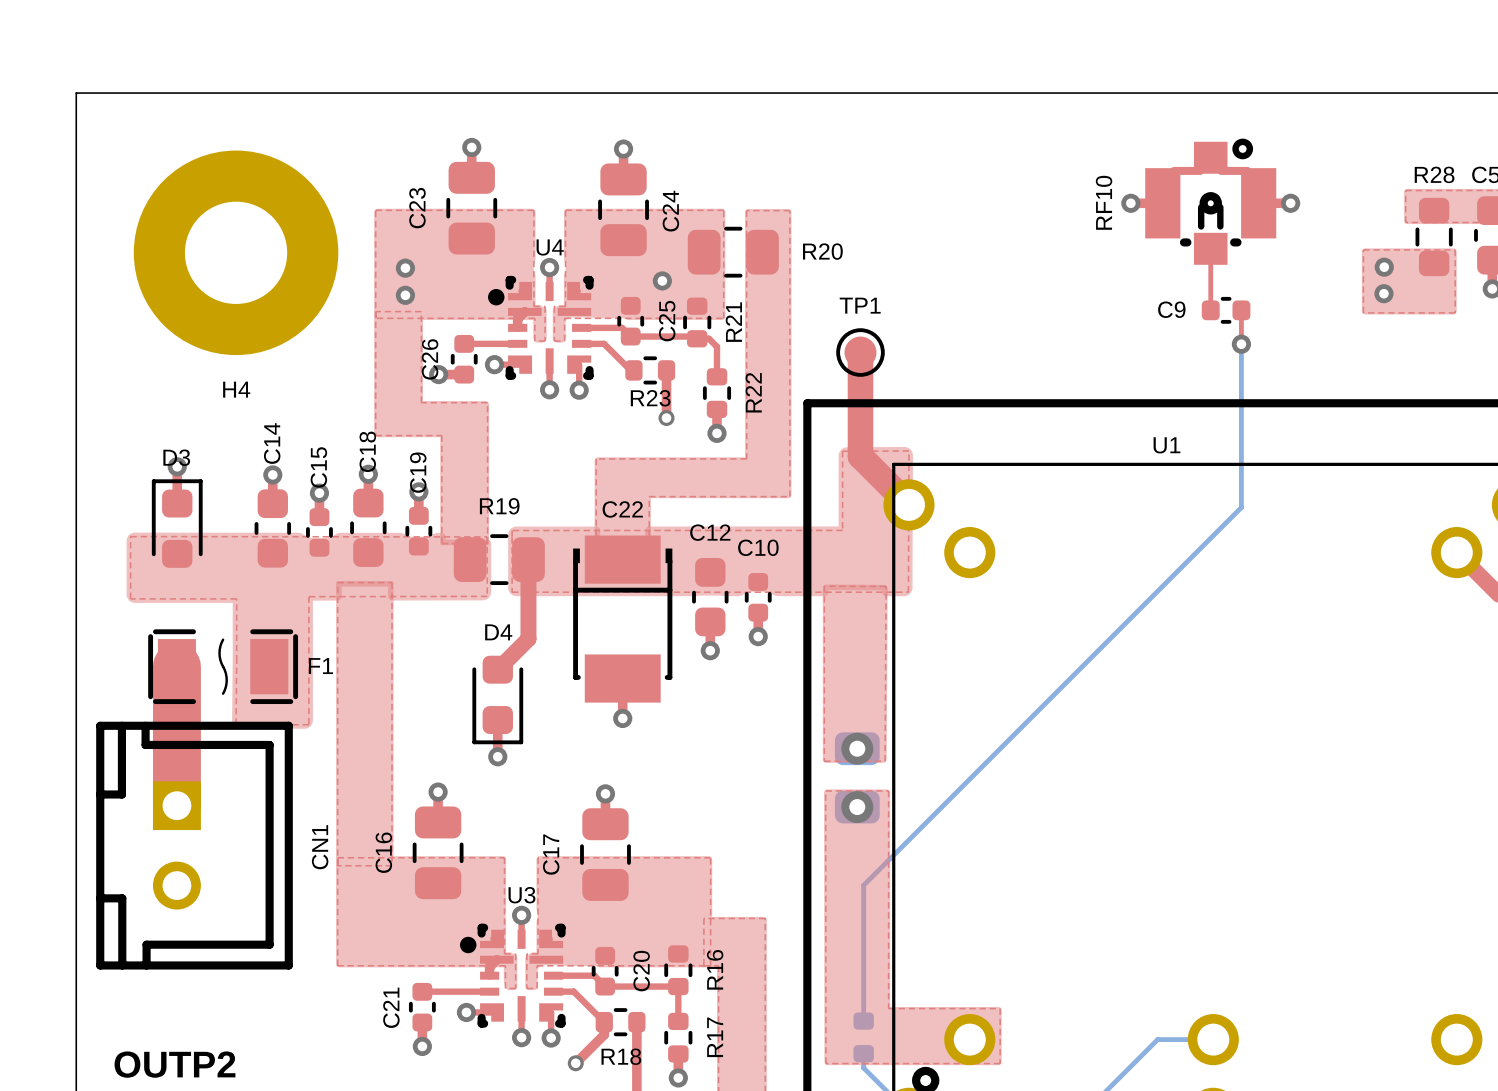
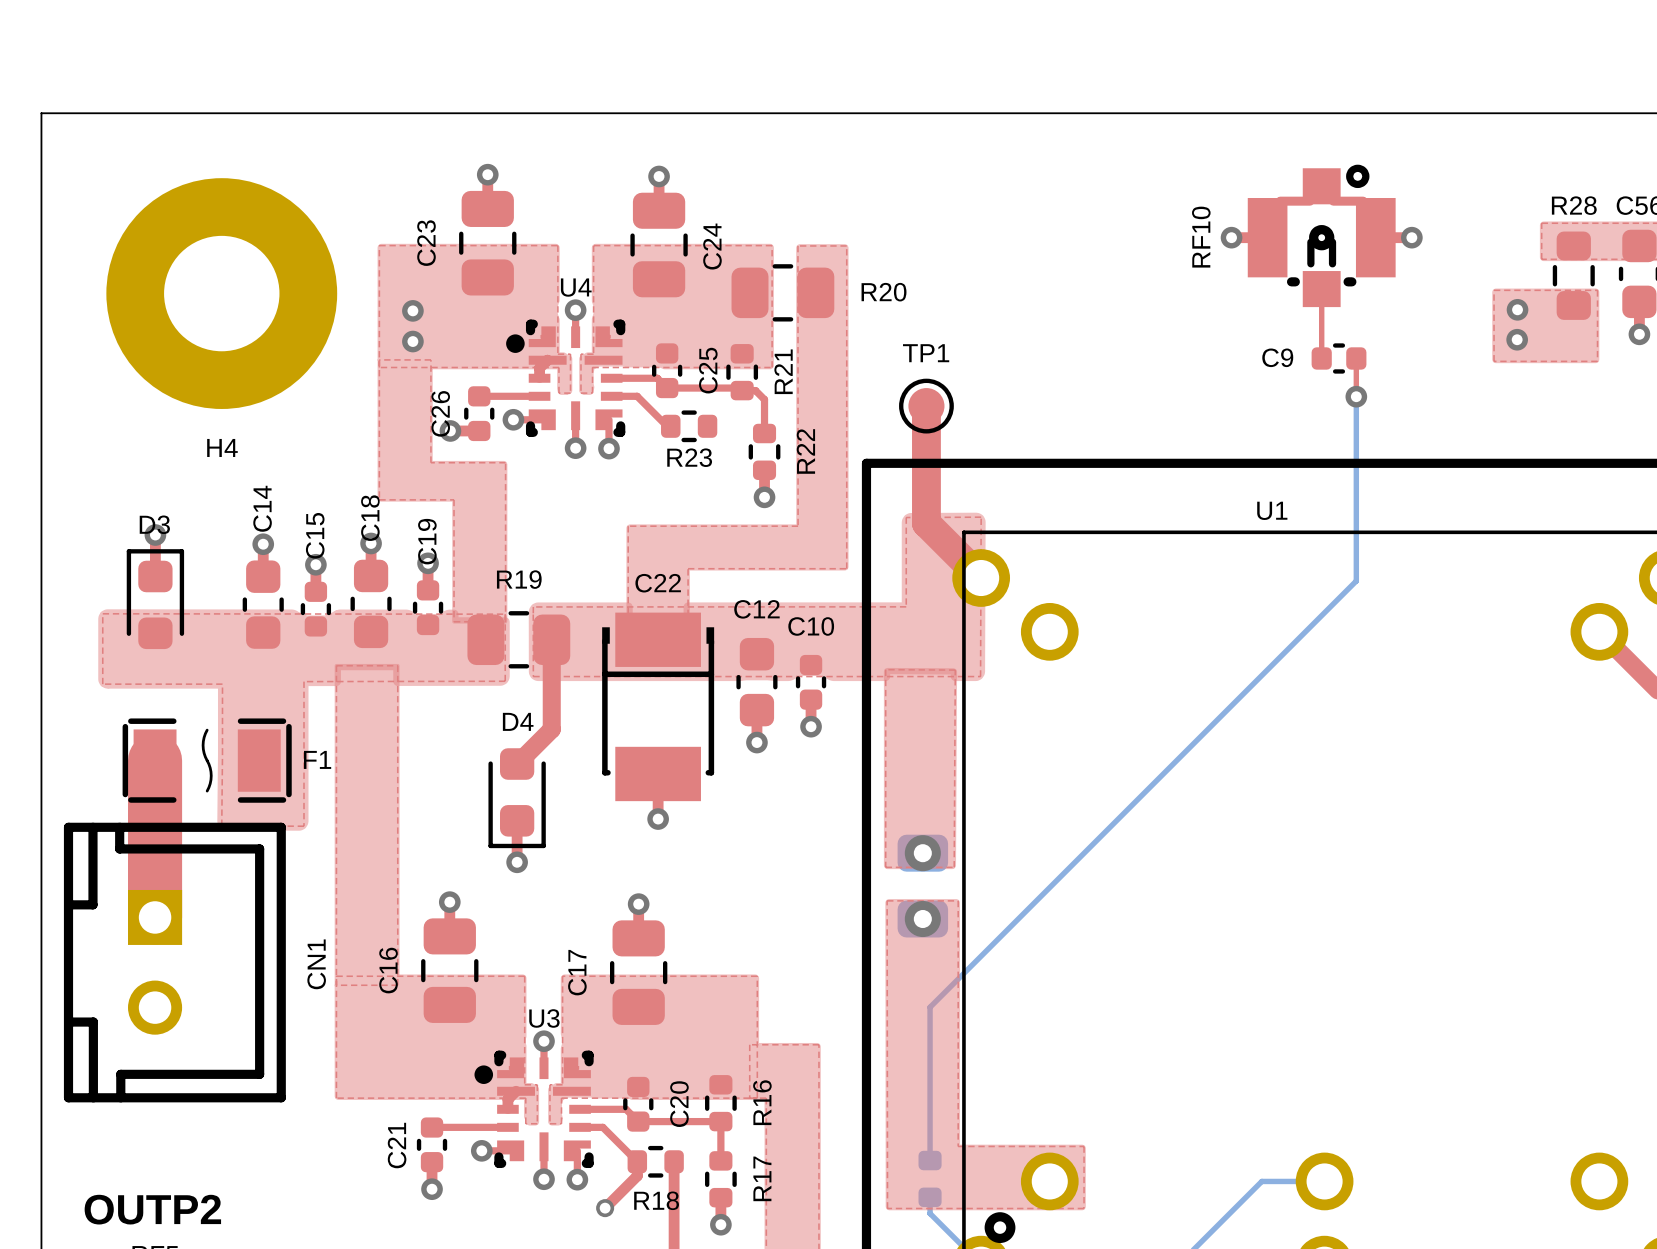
via: (662, 280) -> none
top track: (666, 370) (666, 418) -> none
via: (666, 418) -> none

